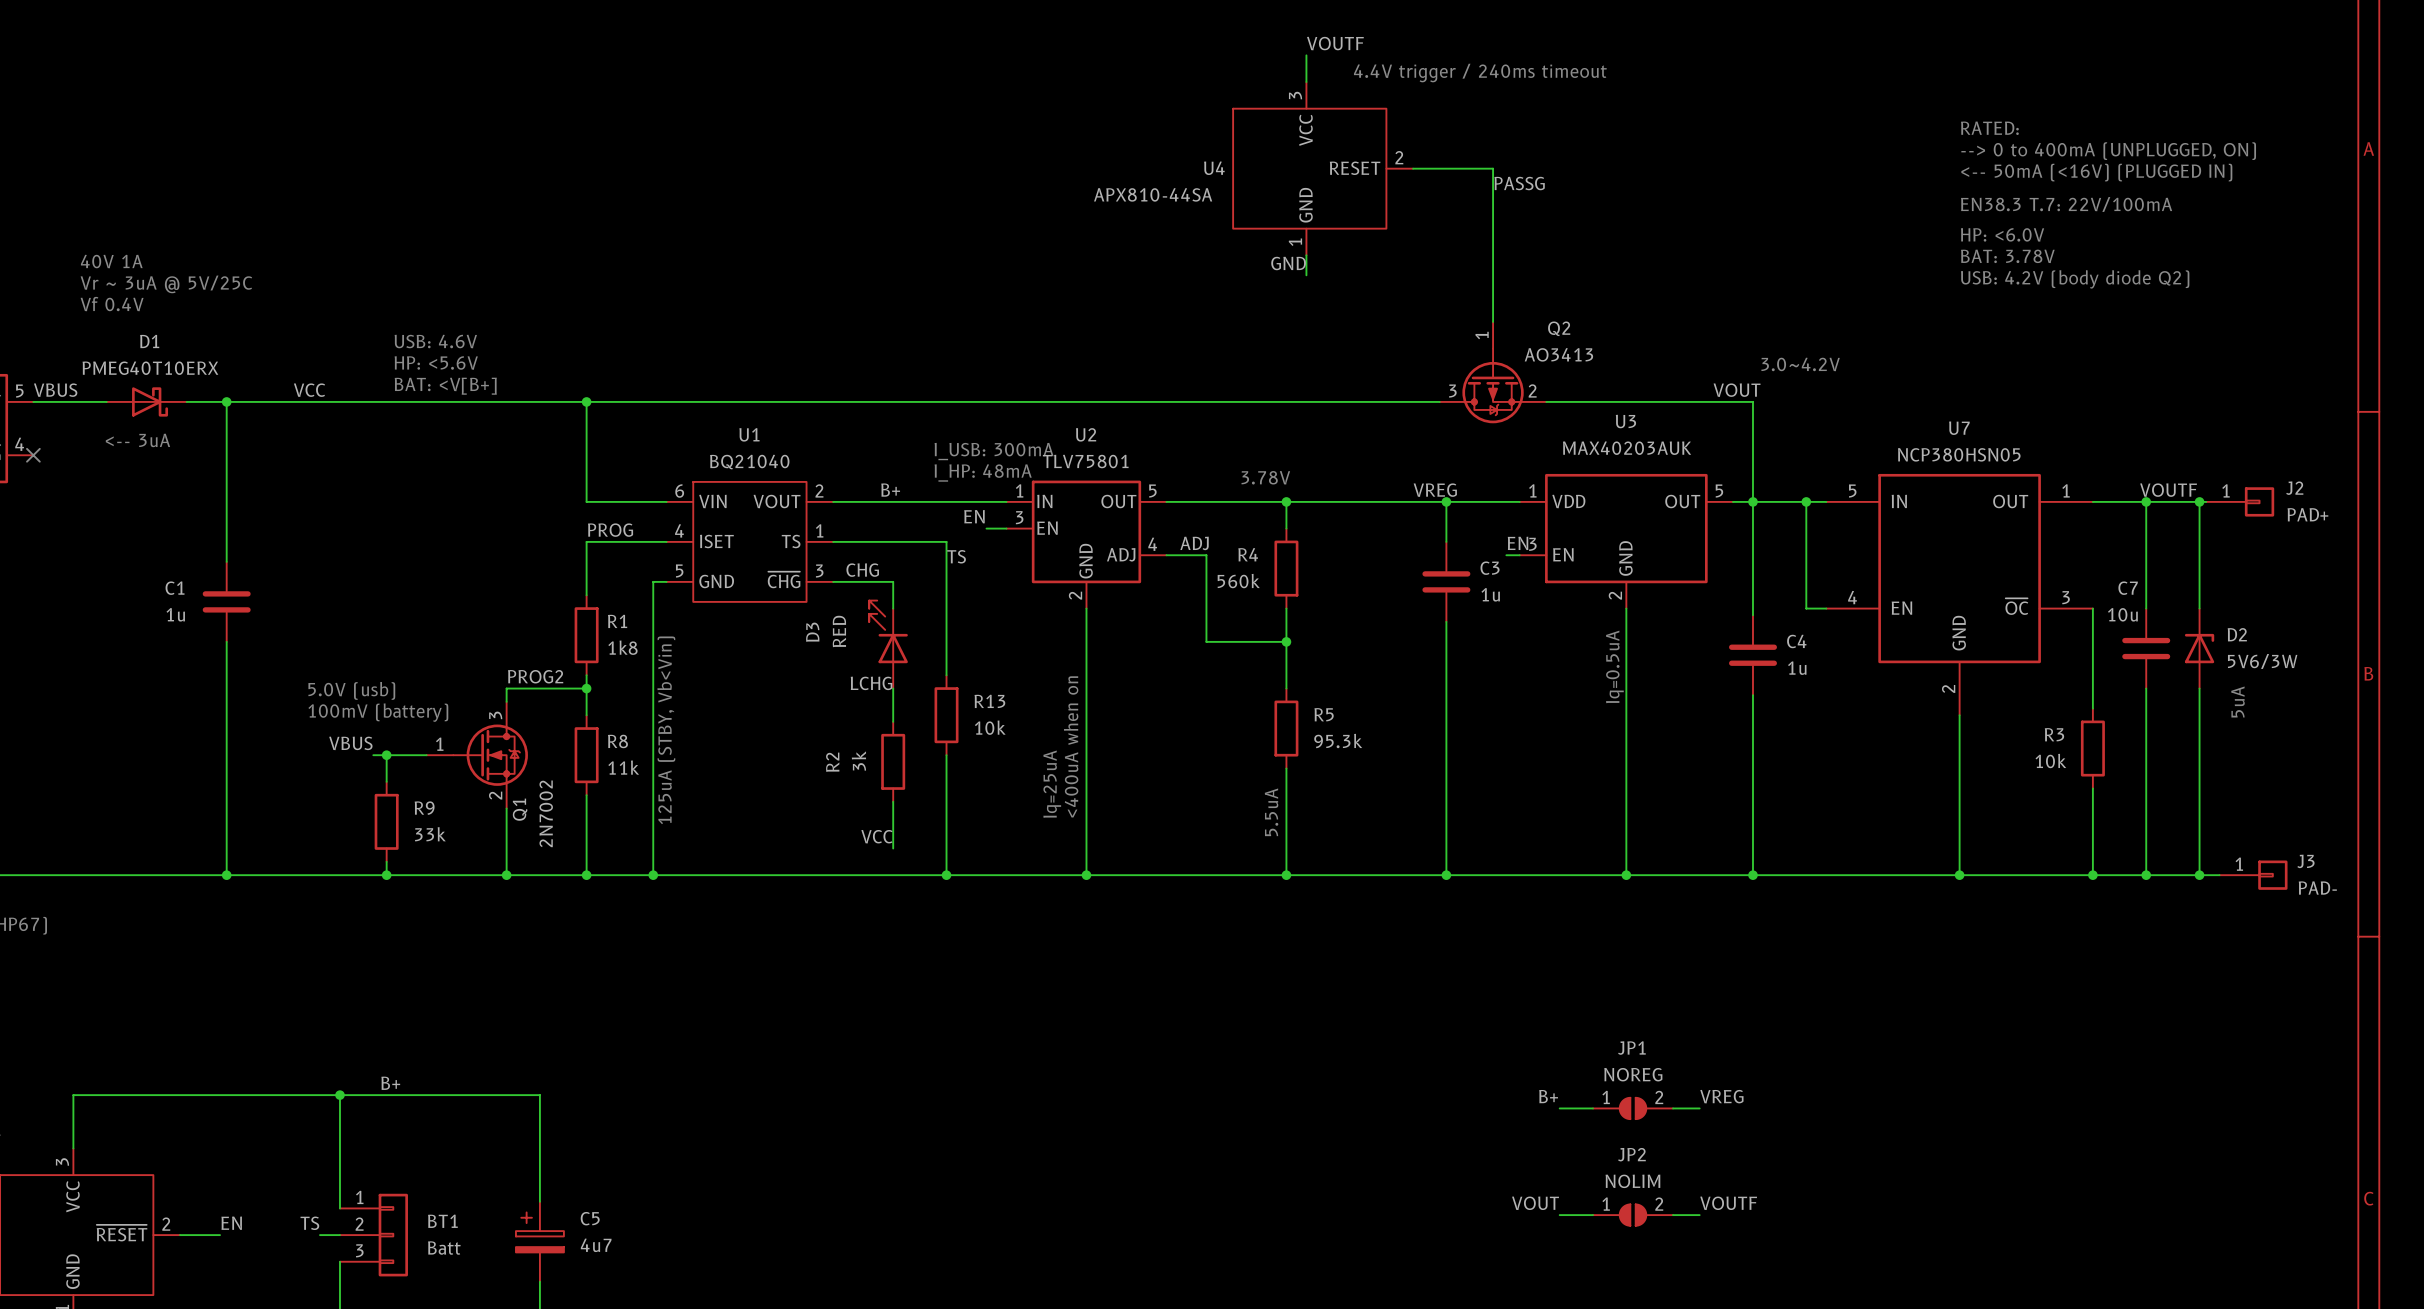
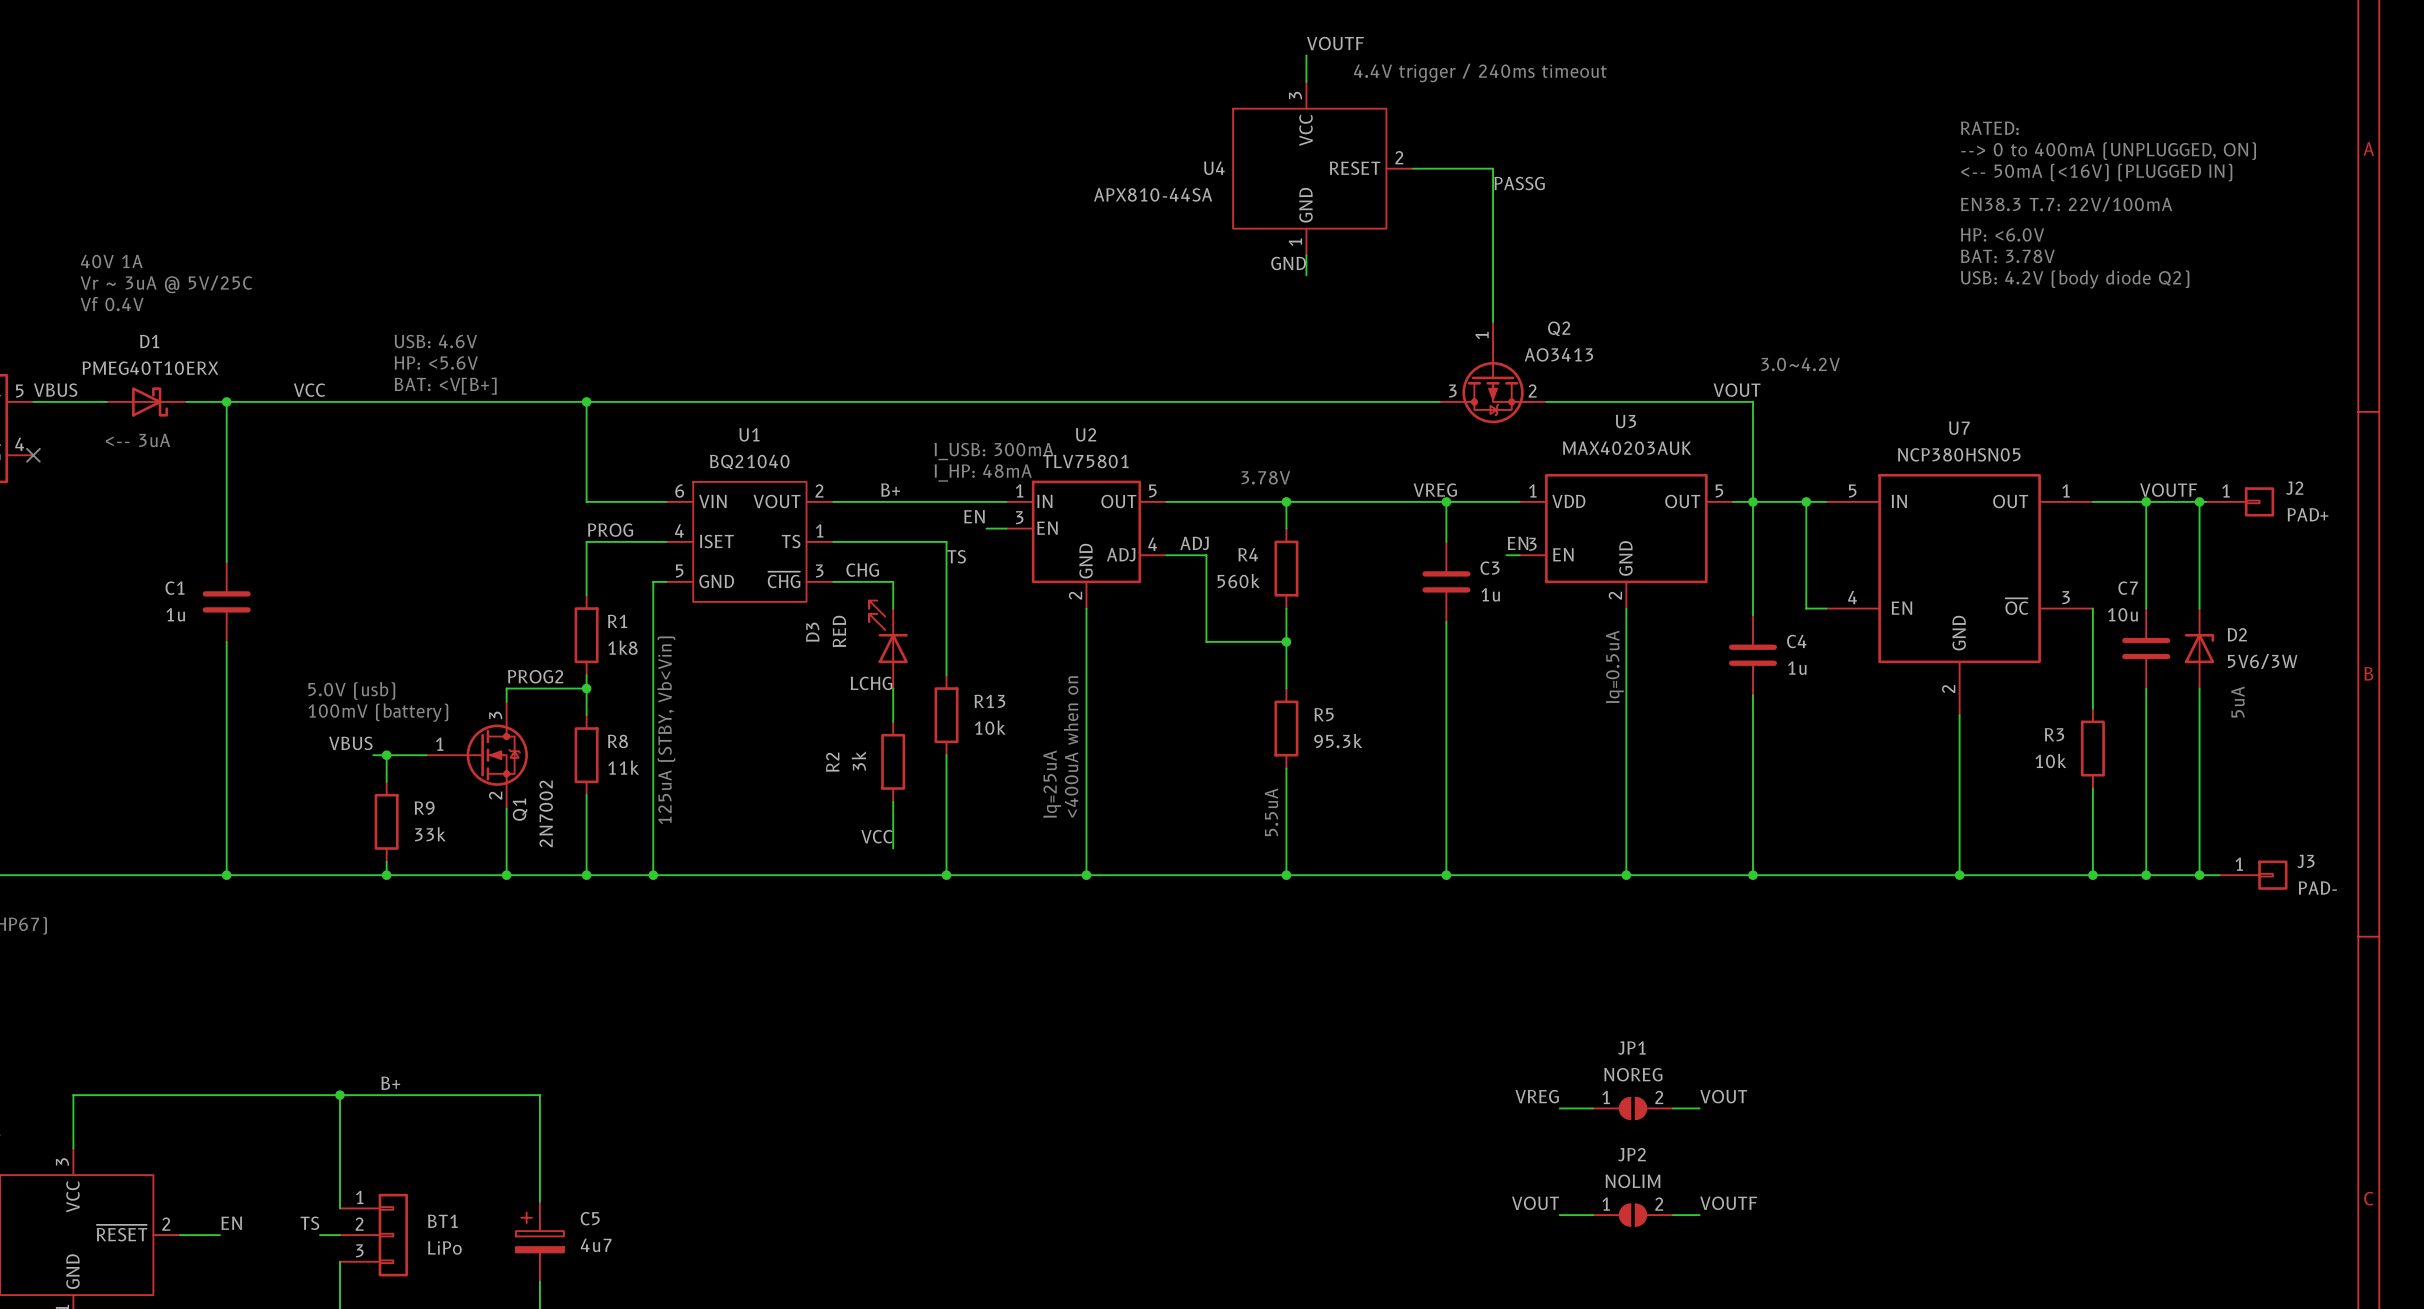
label: B+ (1548, 1096) -> VREG (1537, 1096)
label: VREG (1721, 1096) -> VOUT (1723, 1096)
BT1 value: Batt (444, 1248) -> LiPo (444, 1247)

